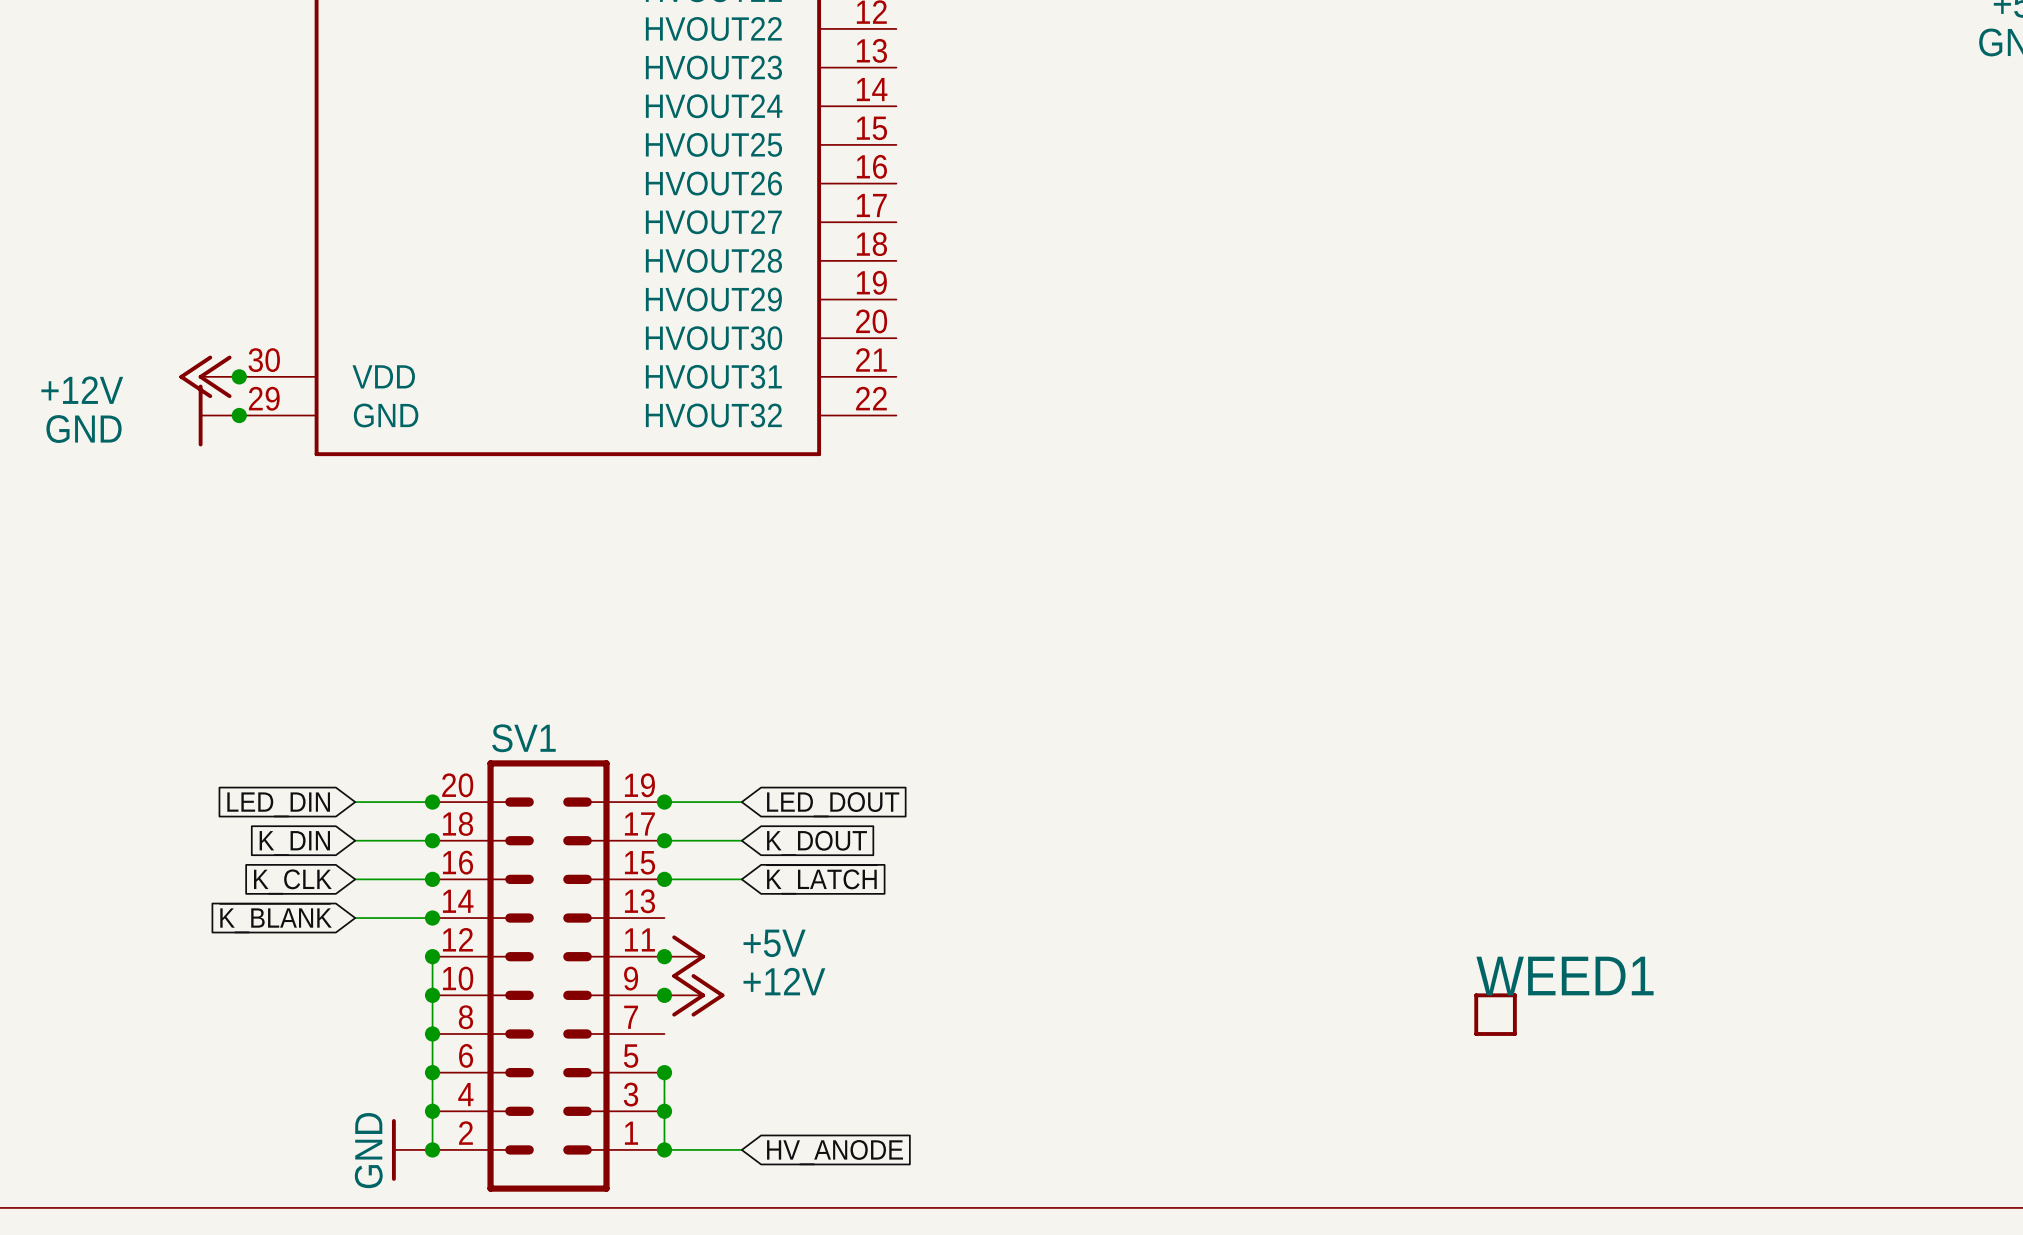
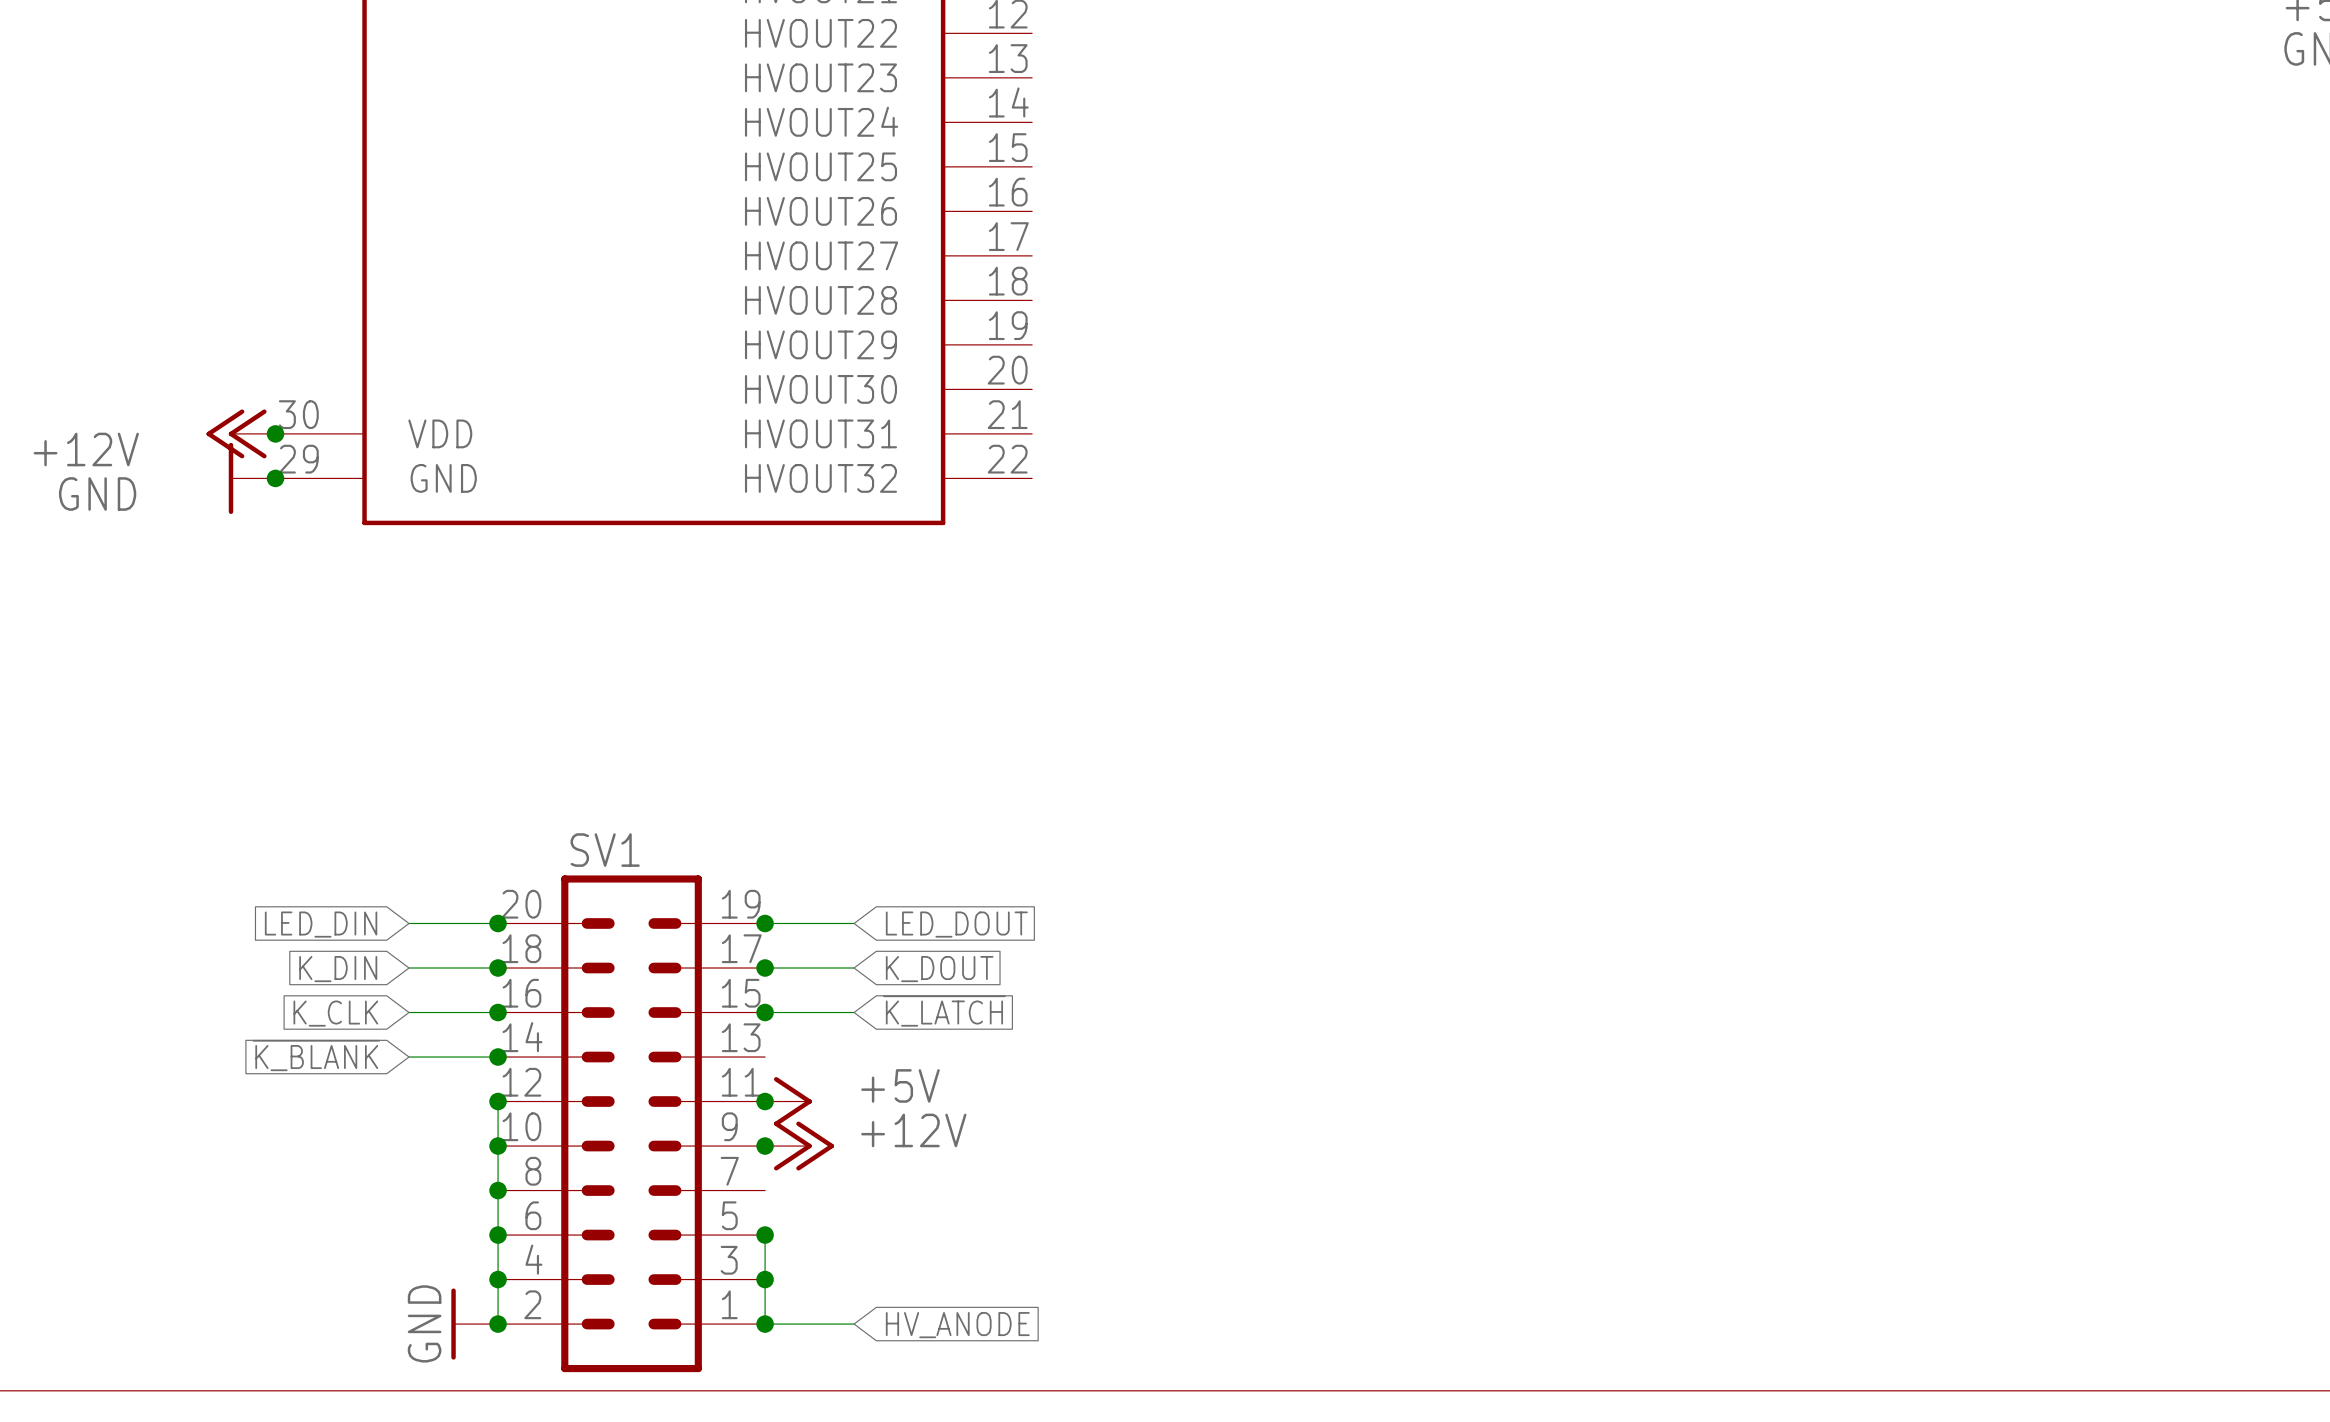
WEED1: (1495, 1014) -> none

